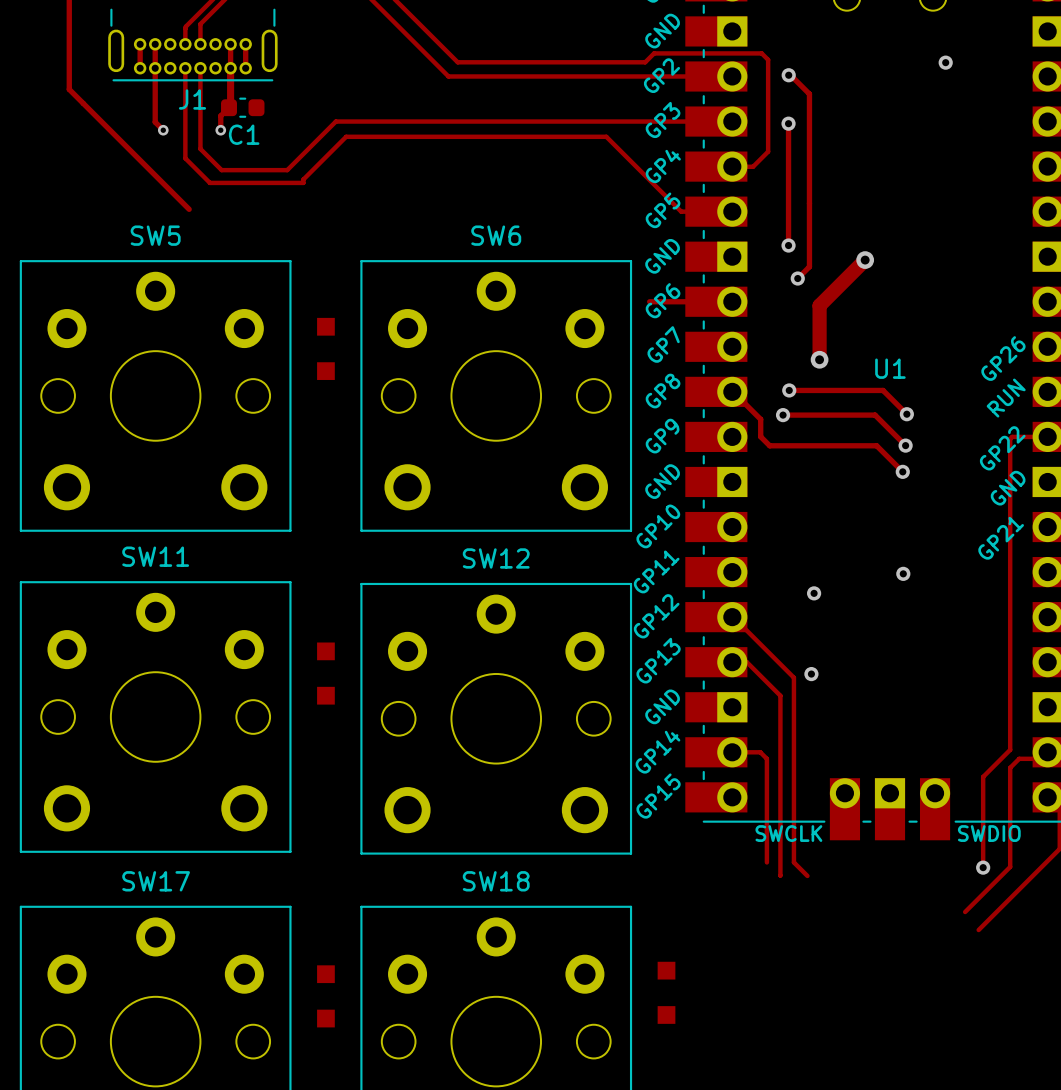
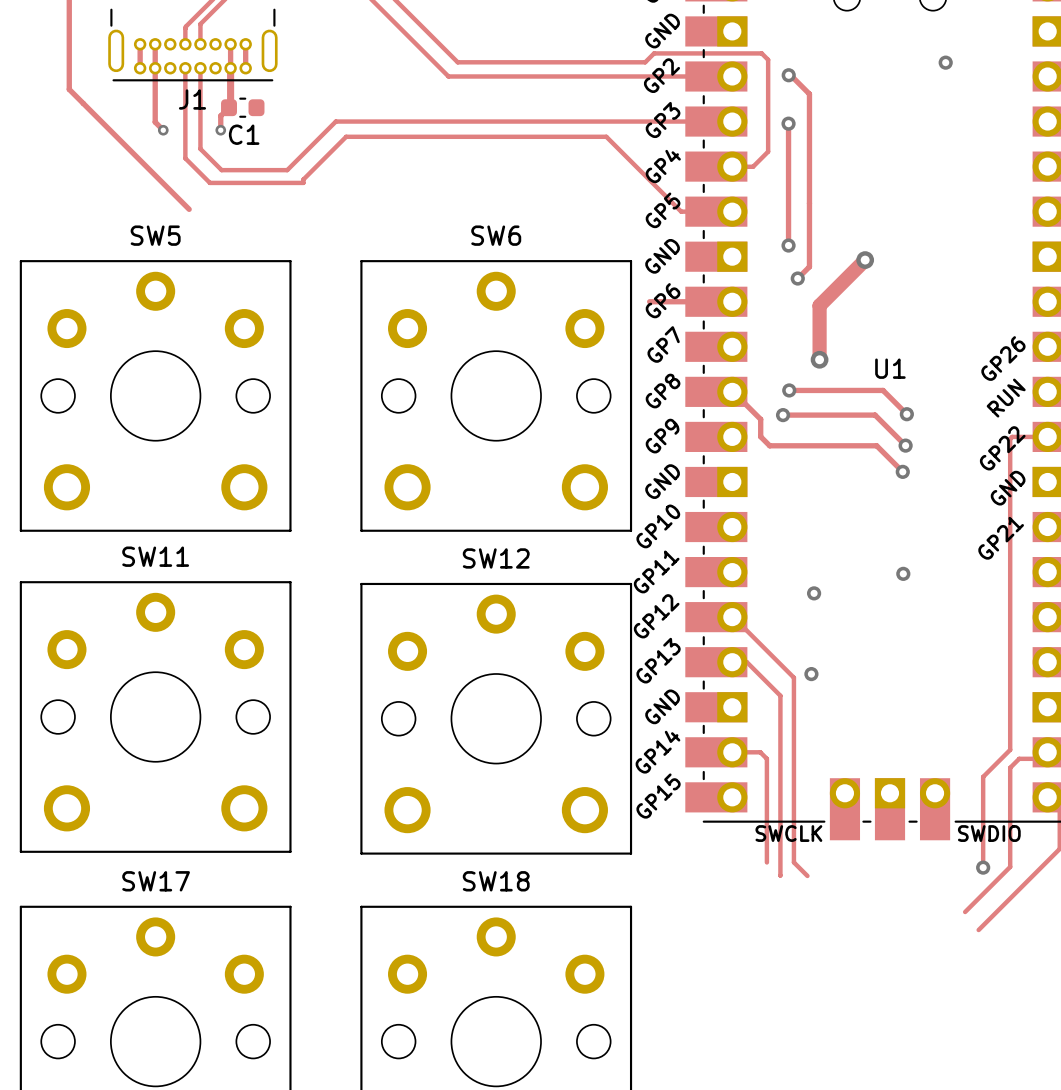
part: (325, 348) -> none
part: (325, 673) -> none
part: (666, 992) -> none
part: (325, 996) -> none

